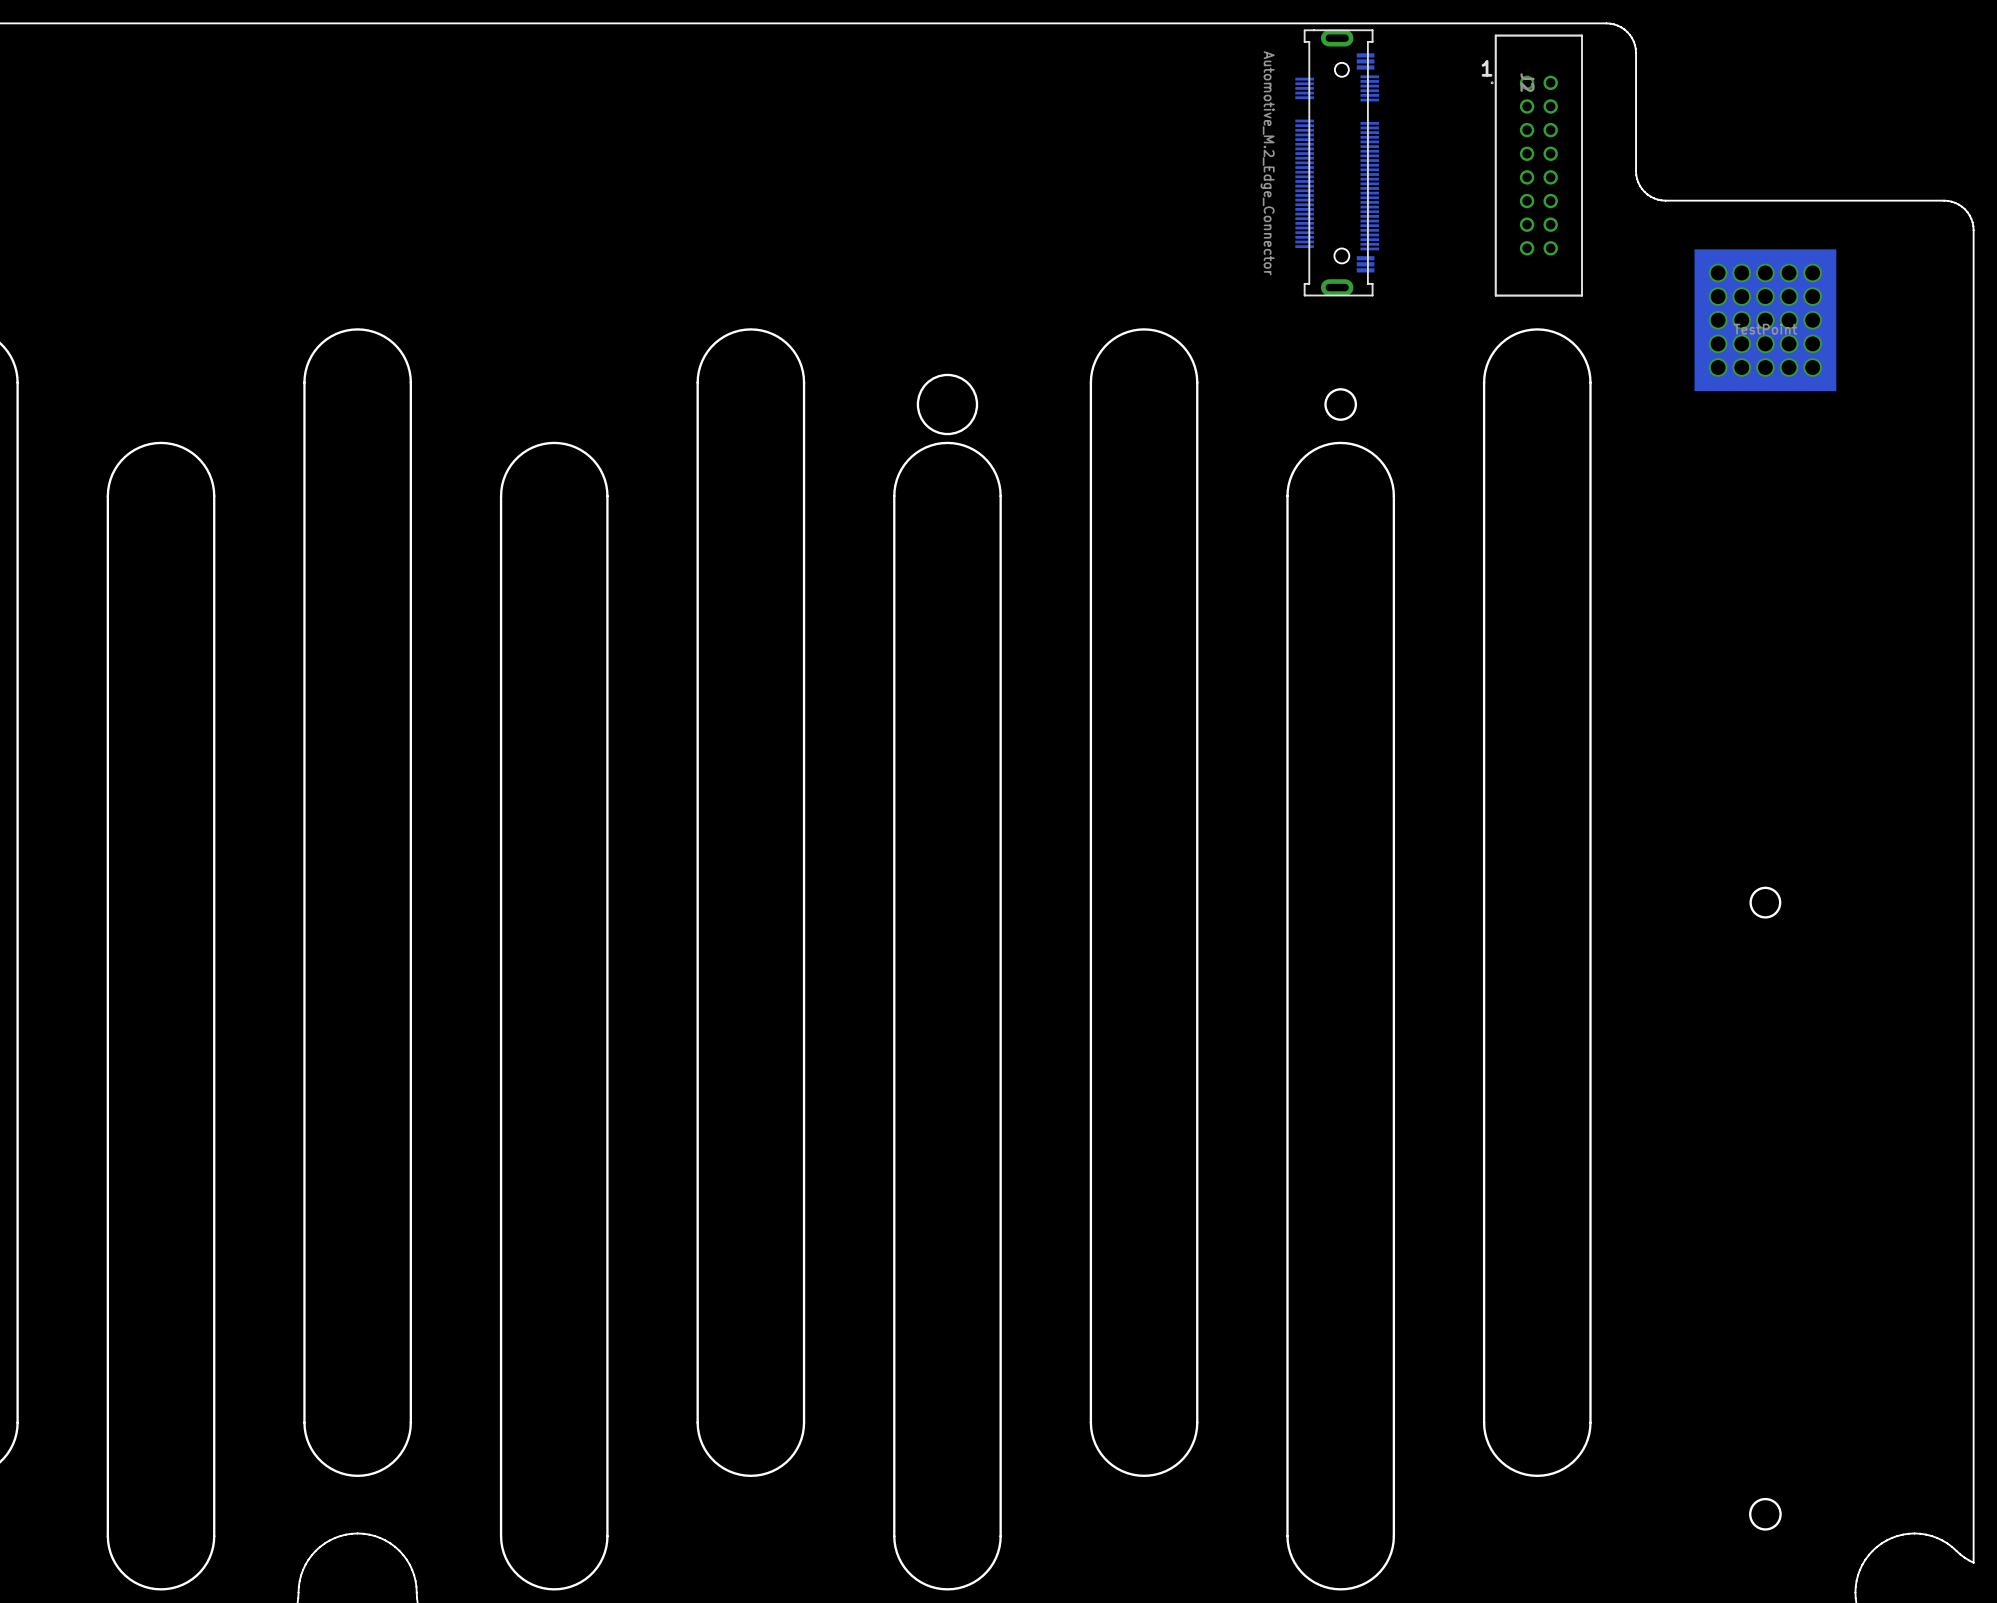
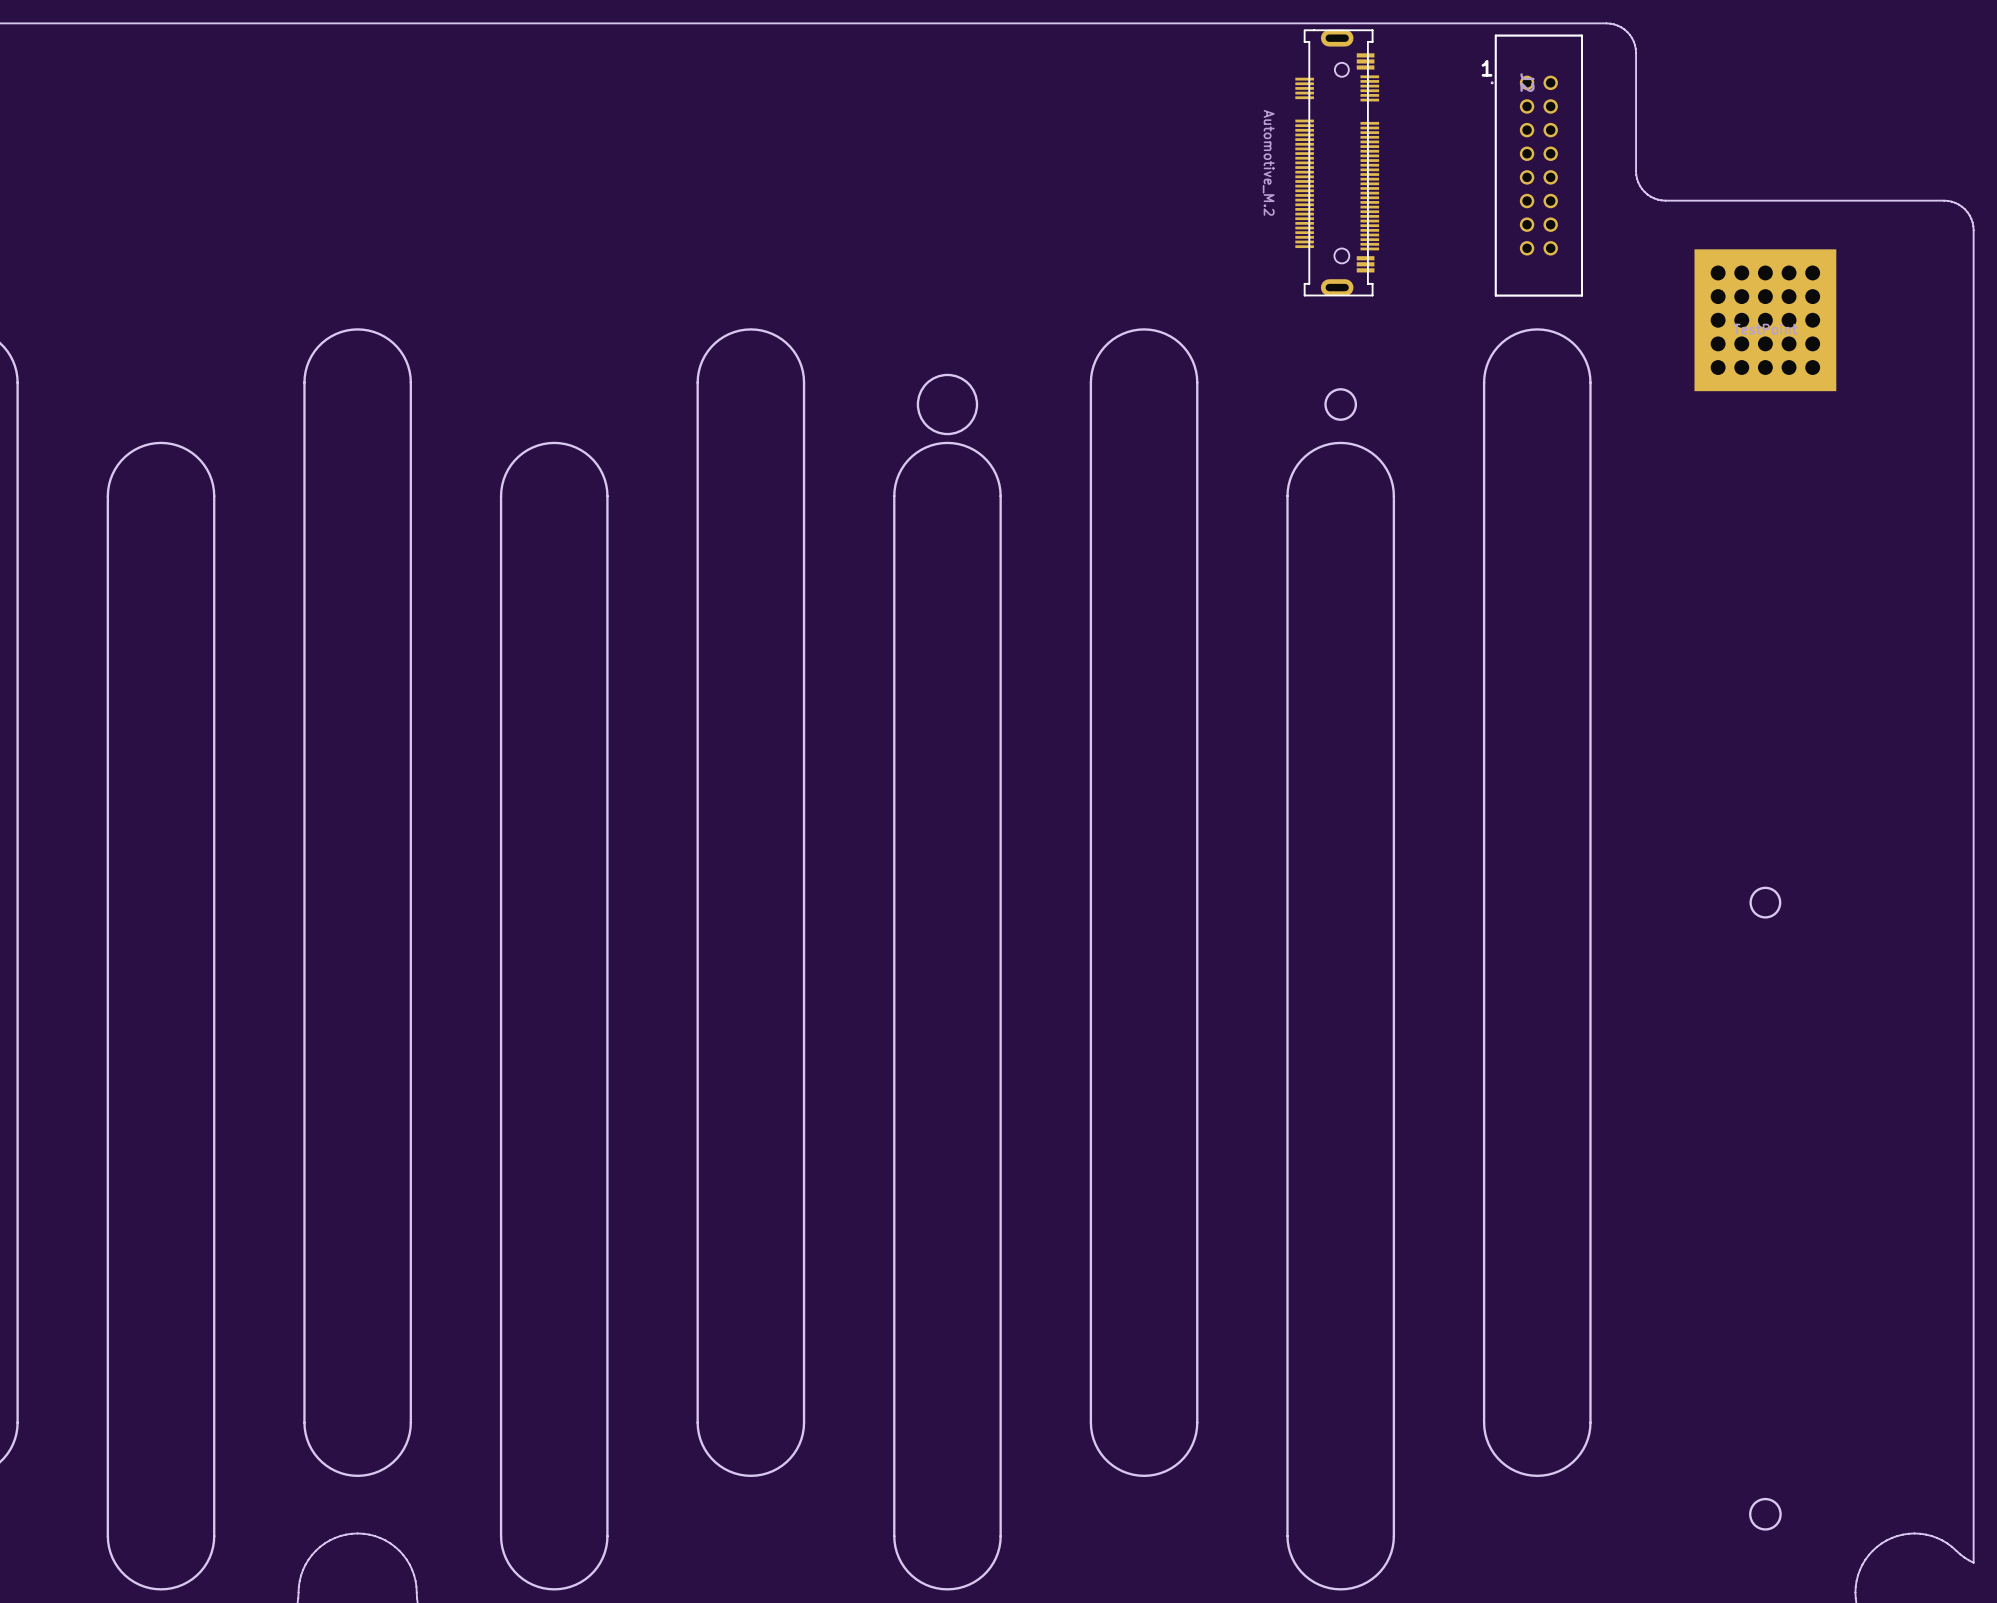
part value: Automotive_M.2_Edge_Connector (1267, 163) -> Automotive_M.2 (1268, 162)

